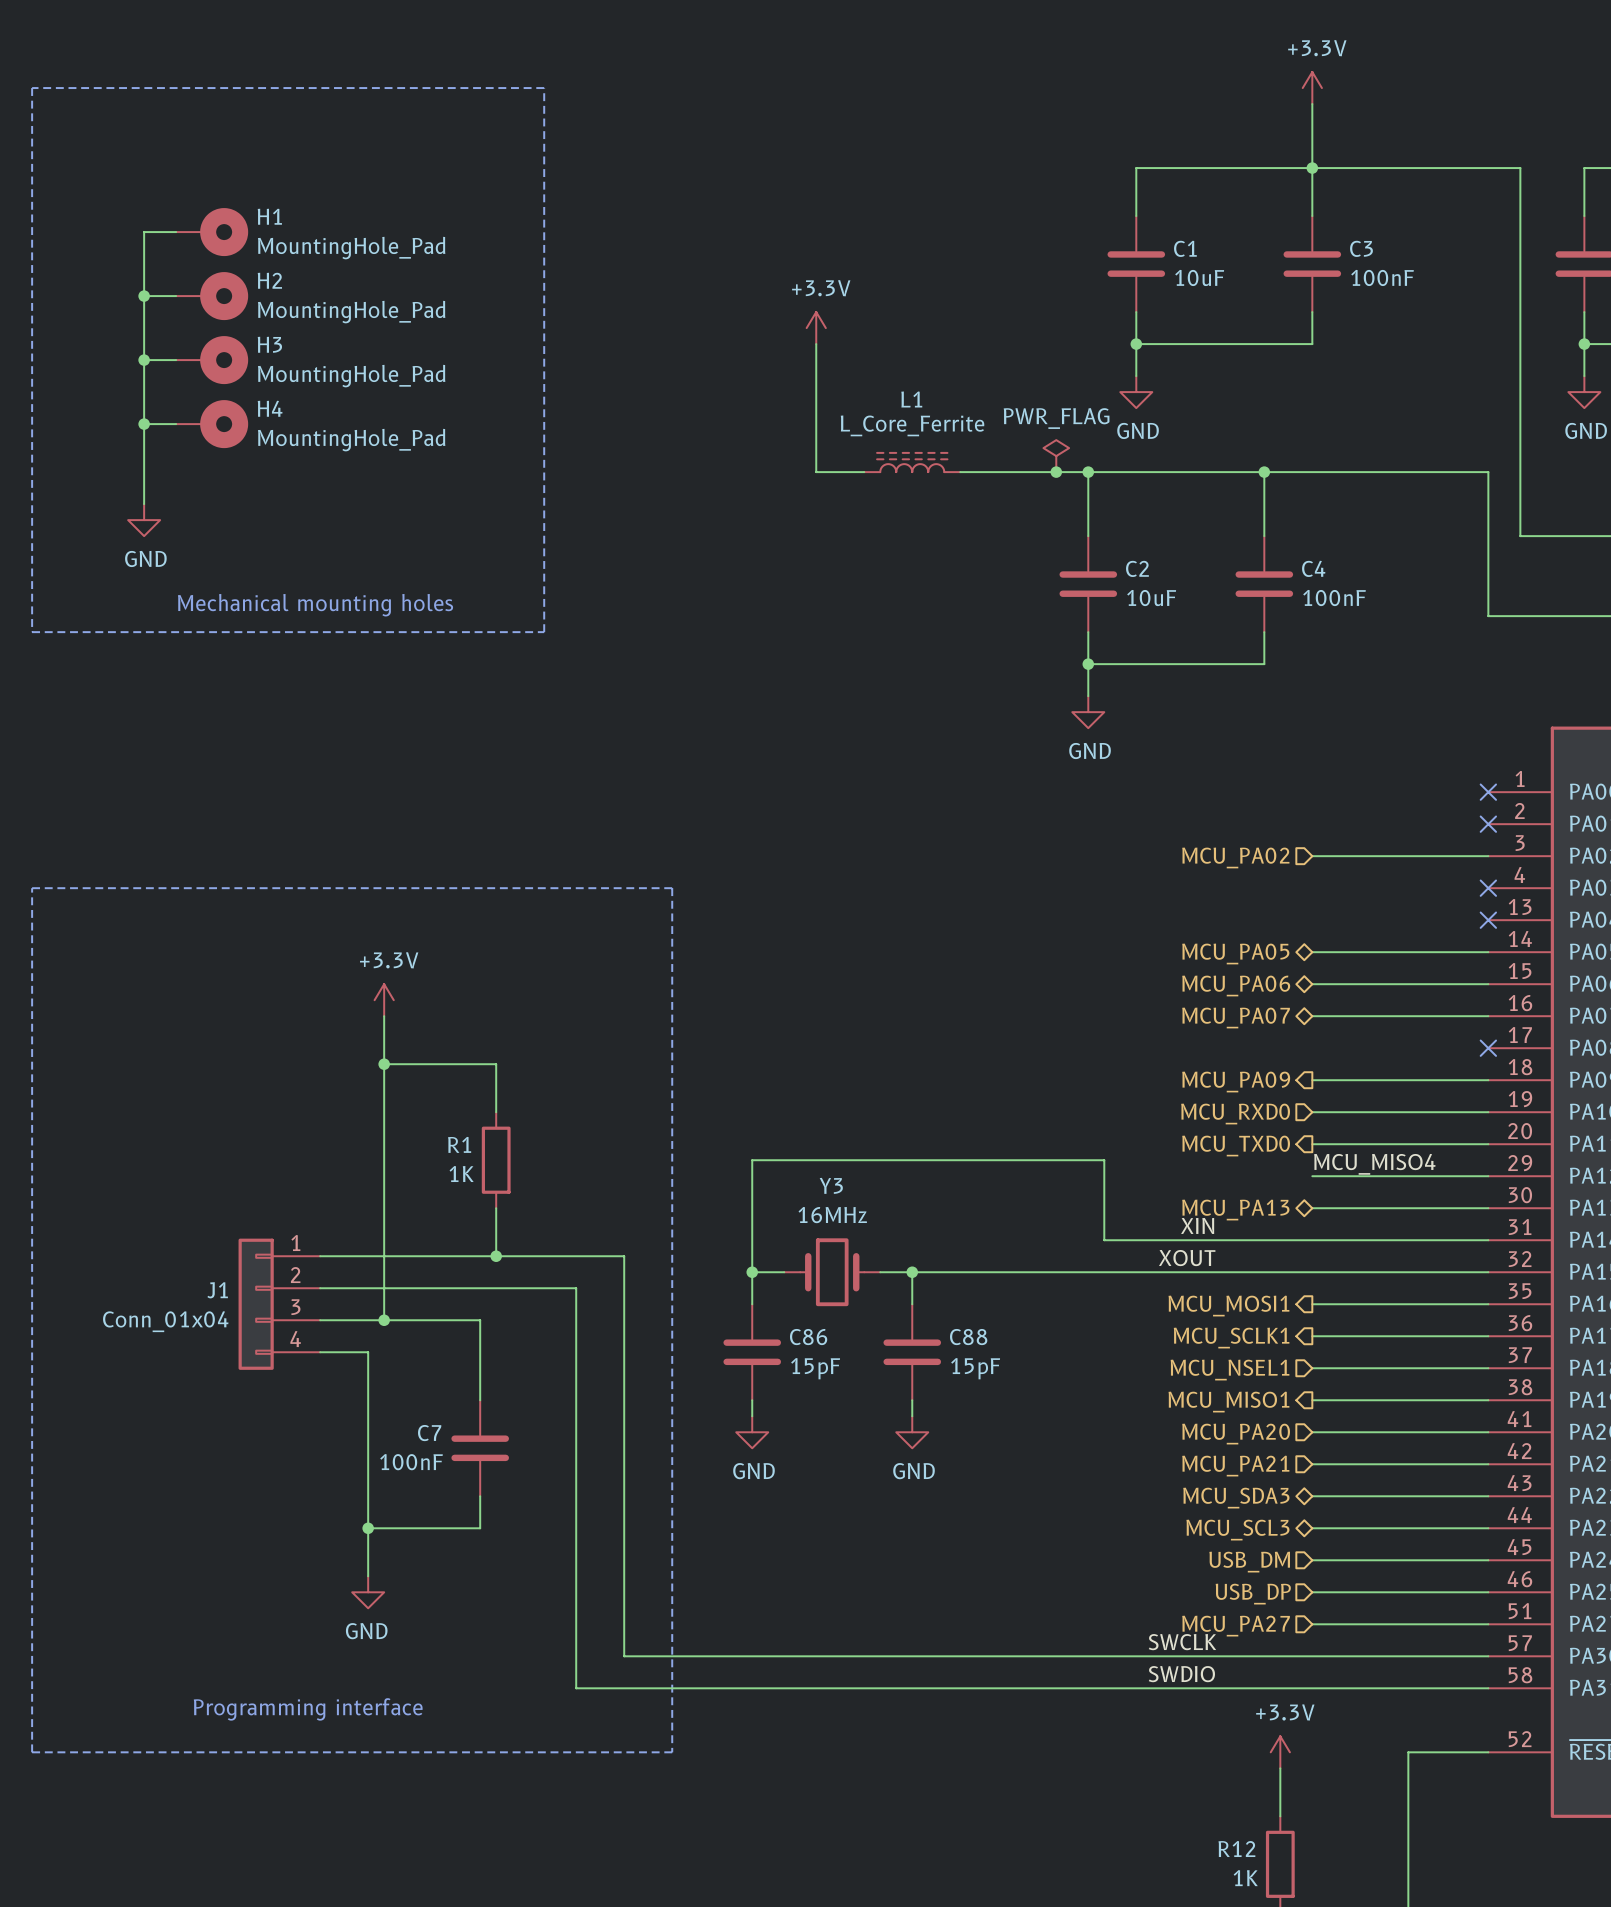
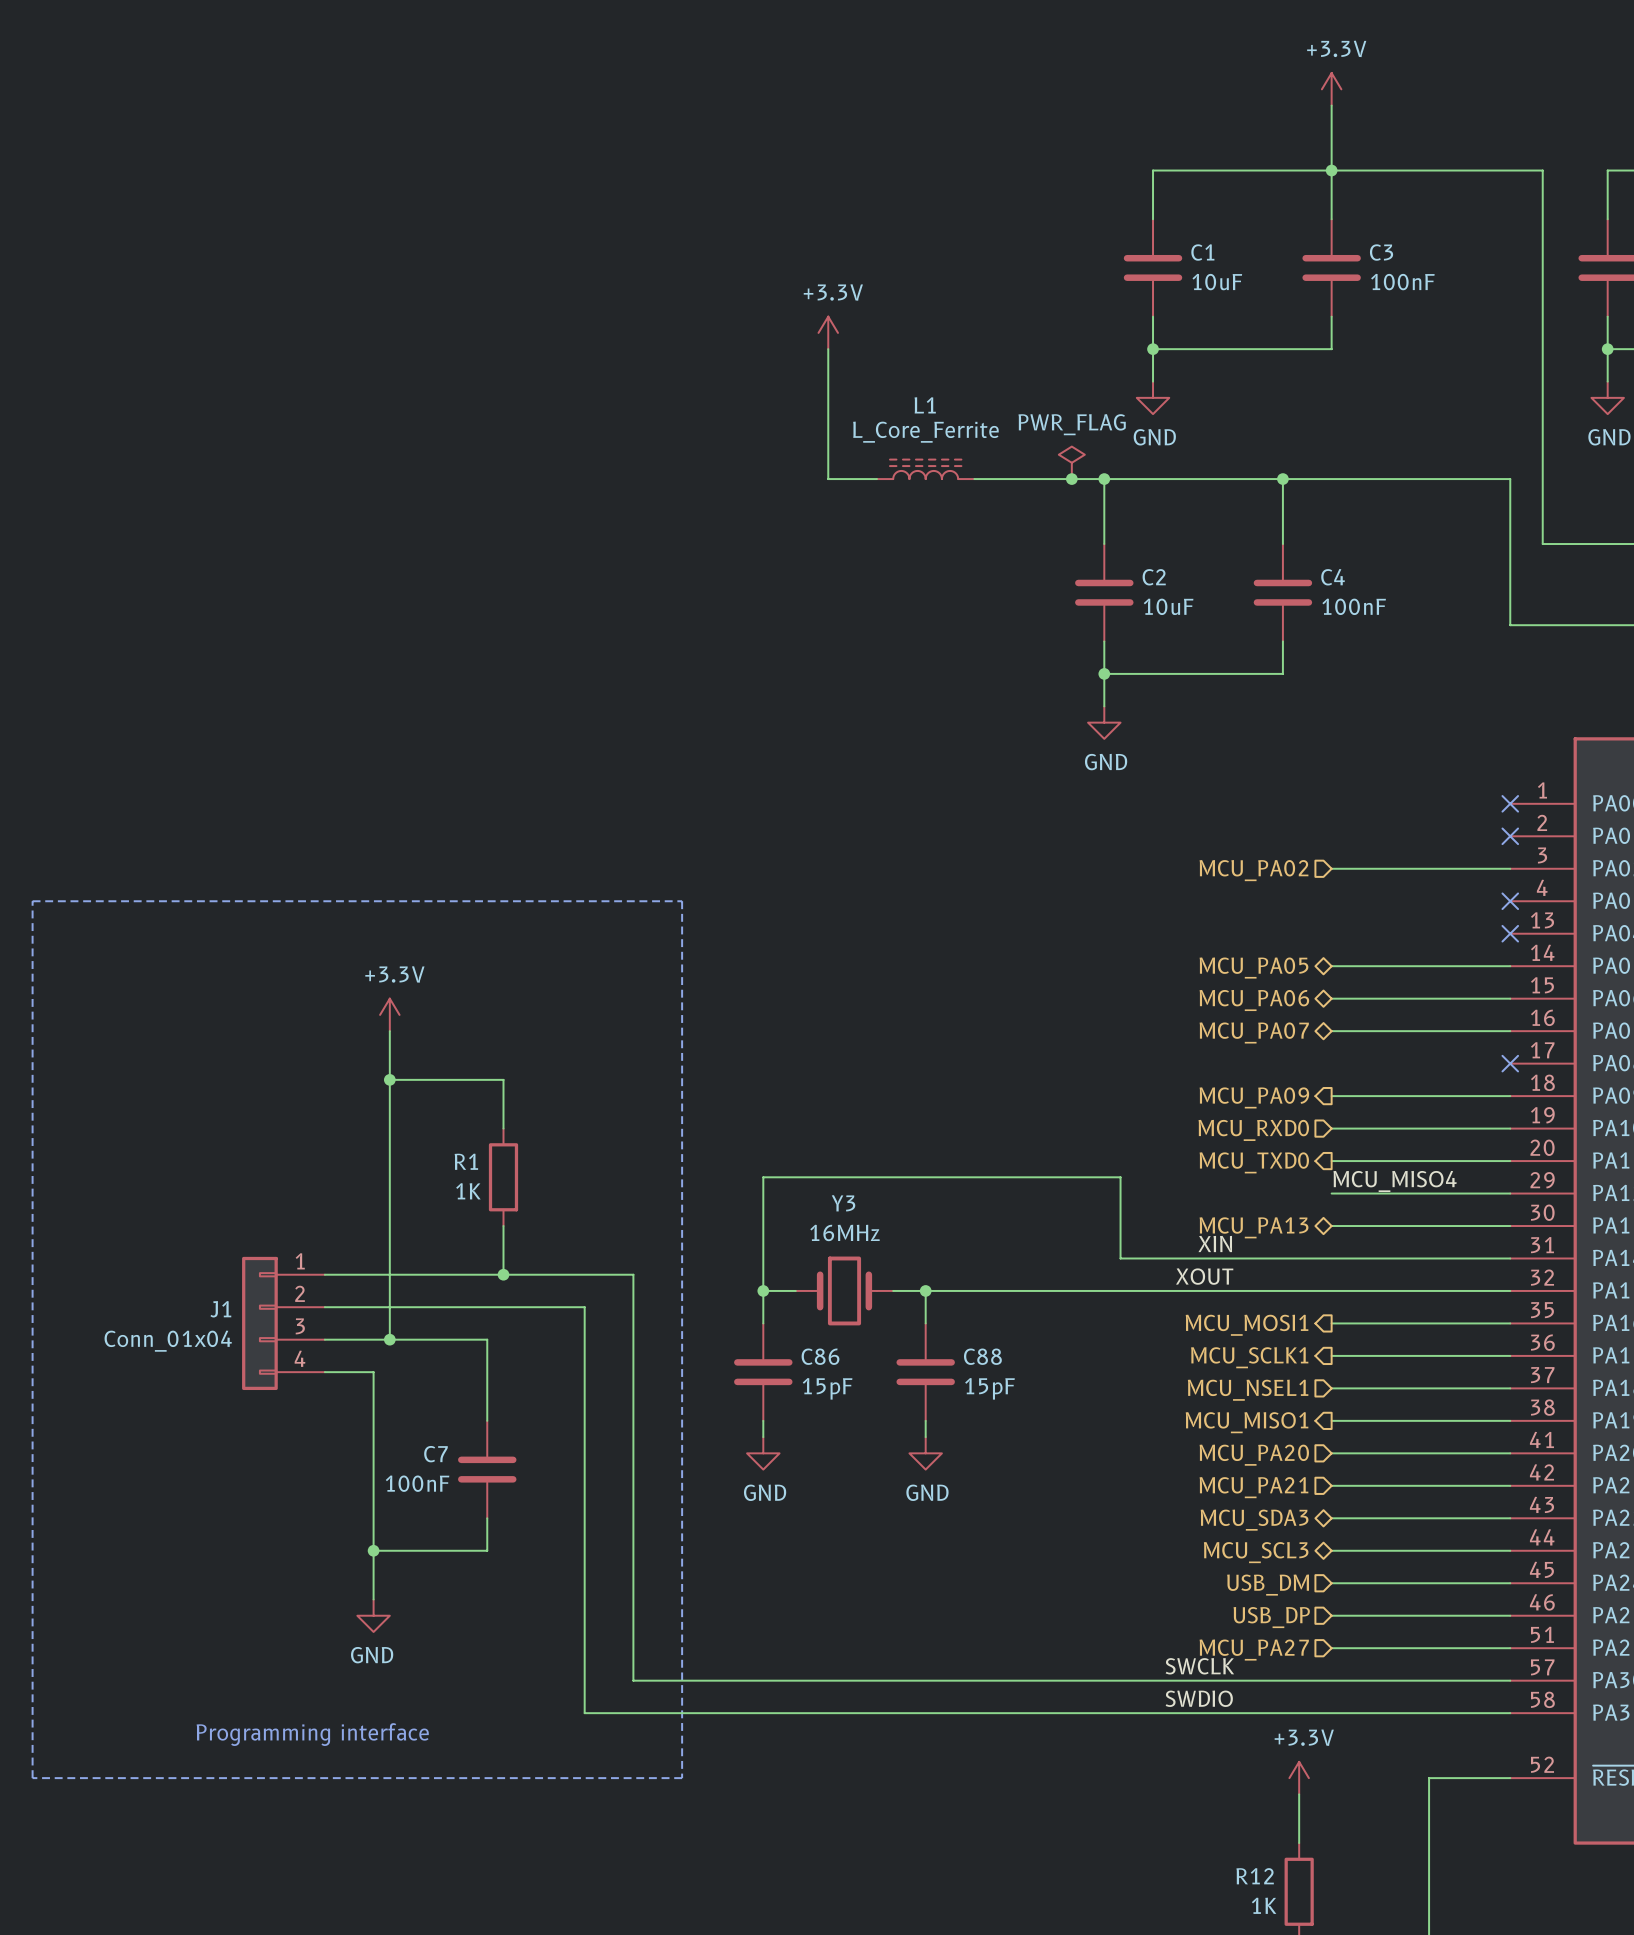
line: (32, 88) (32, 632) (544, 632) (544, 88) (32, 88) -> none
wire: (176, 232) (144, 232) (144, 504) -> none
H1: MountingHole_Pad (212, 232) -> none
wire: (144, 296) (176, 296) -> none
junction: (144, 296) -> none
H2: MountingHole_Pad (212, 296) -> none
wire: (144, 360) (176, 360) -> none
junction: (144, 360) -> none
H3: MountingHole_Pad (212, 360) -> none
wire: (144, 424) (176, 424) -> none
junction: (144, 424) -> none
H4: MountingHole_Pad (212, 424) -> none
power symbol: GND (144, 520) -> none
text: Mechanical mounting holes (315, 605) -> none

